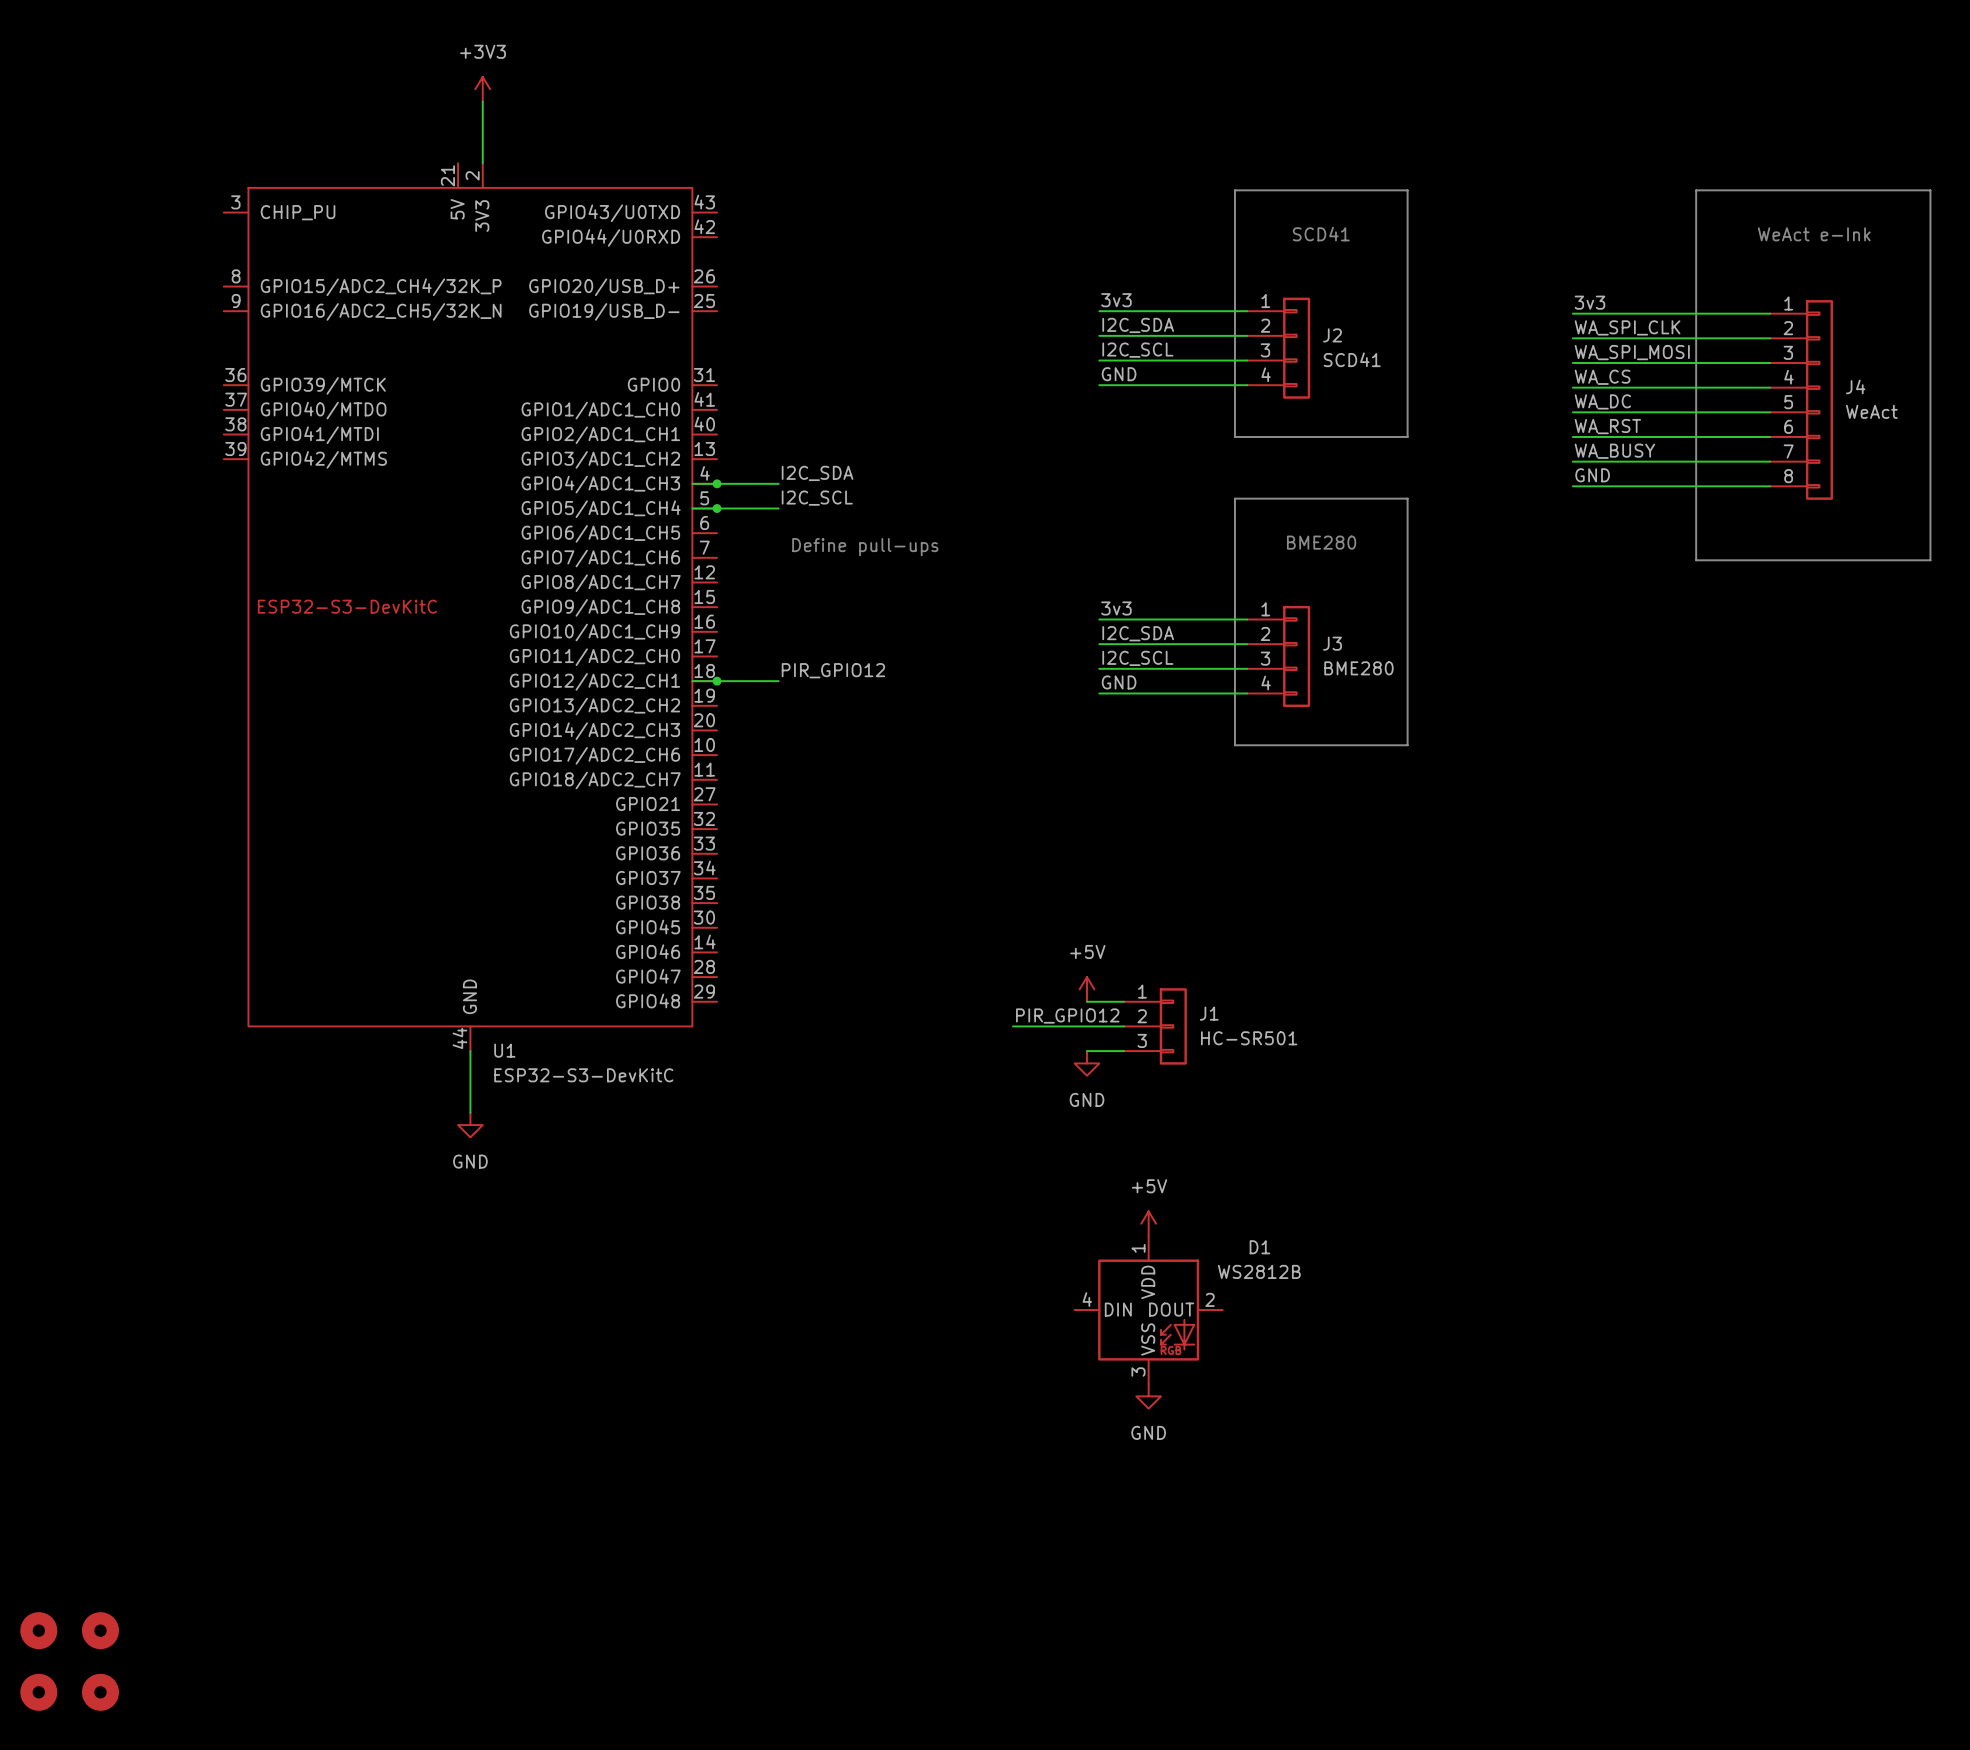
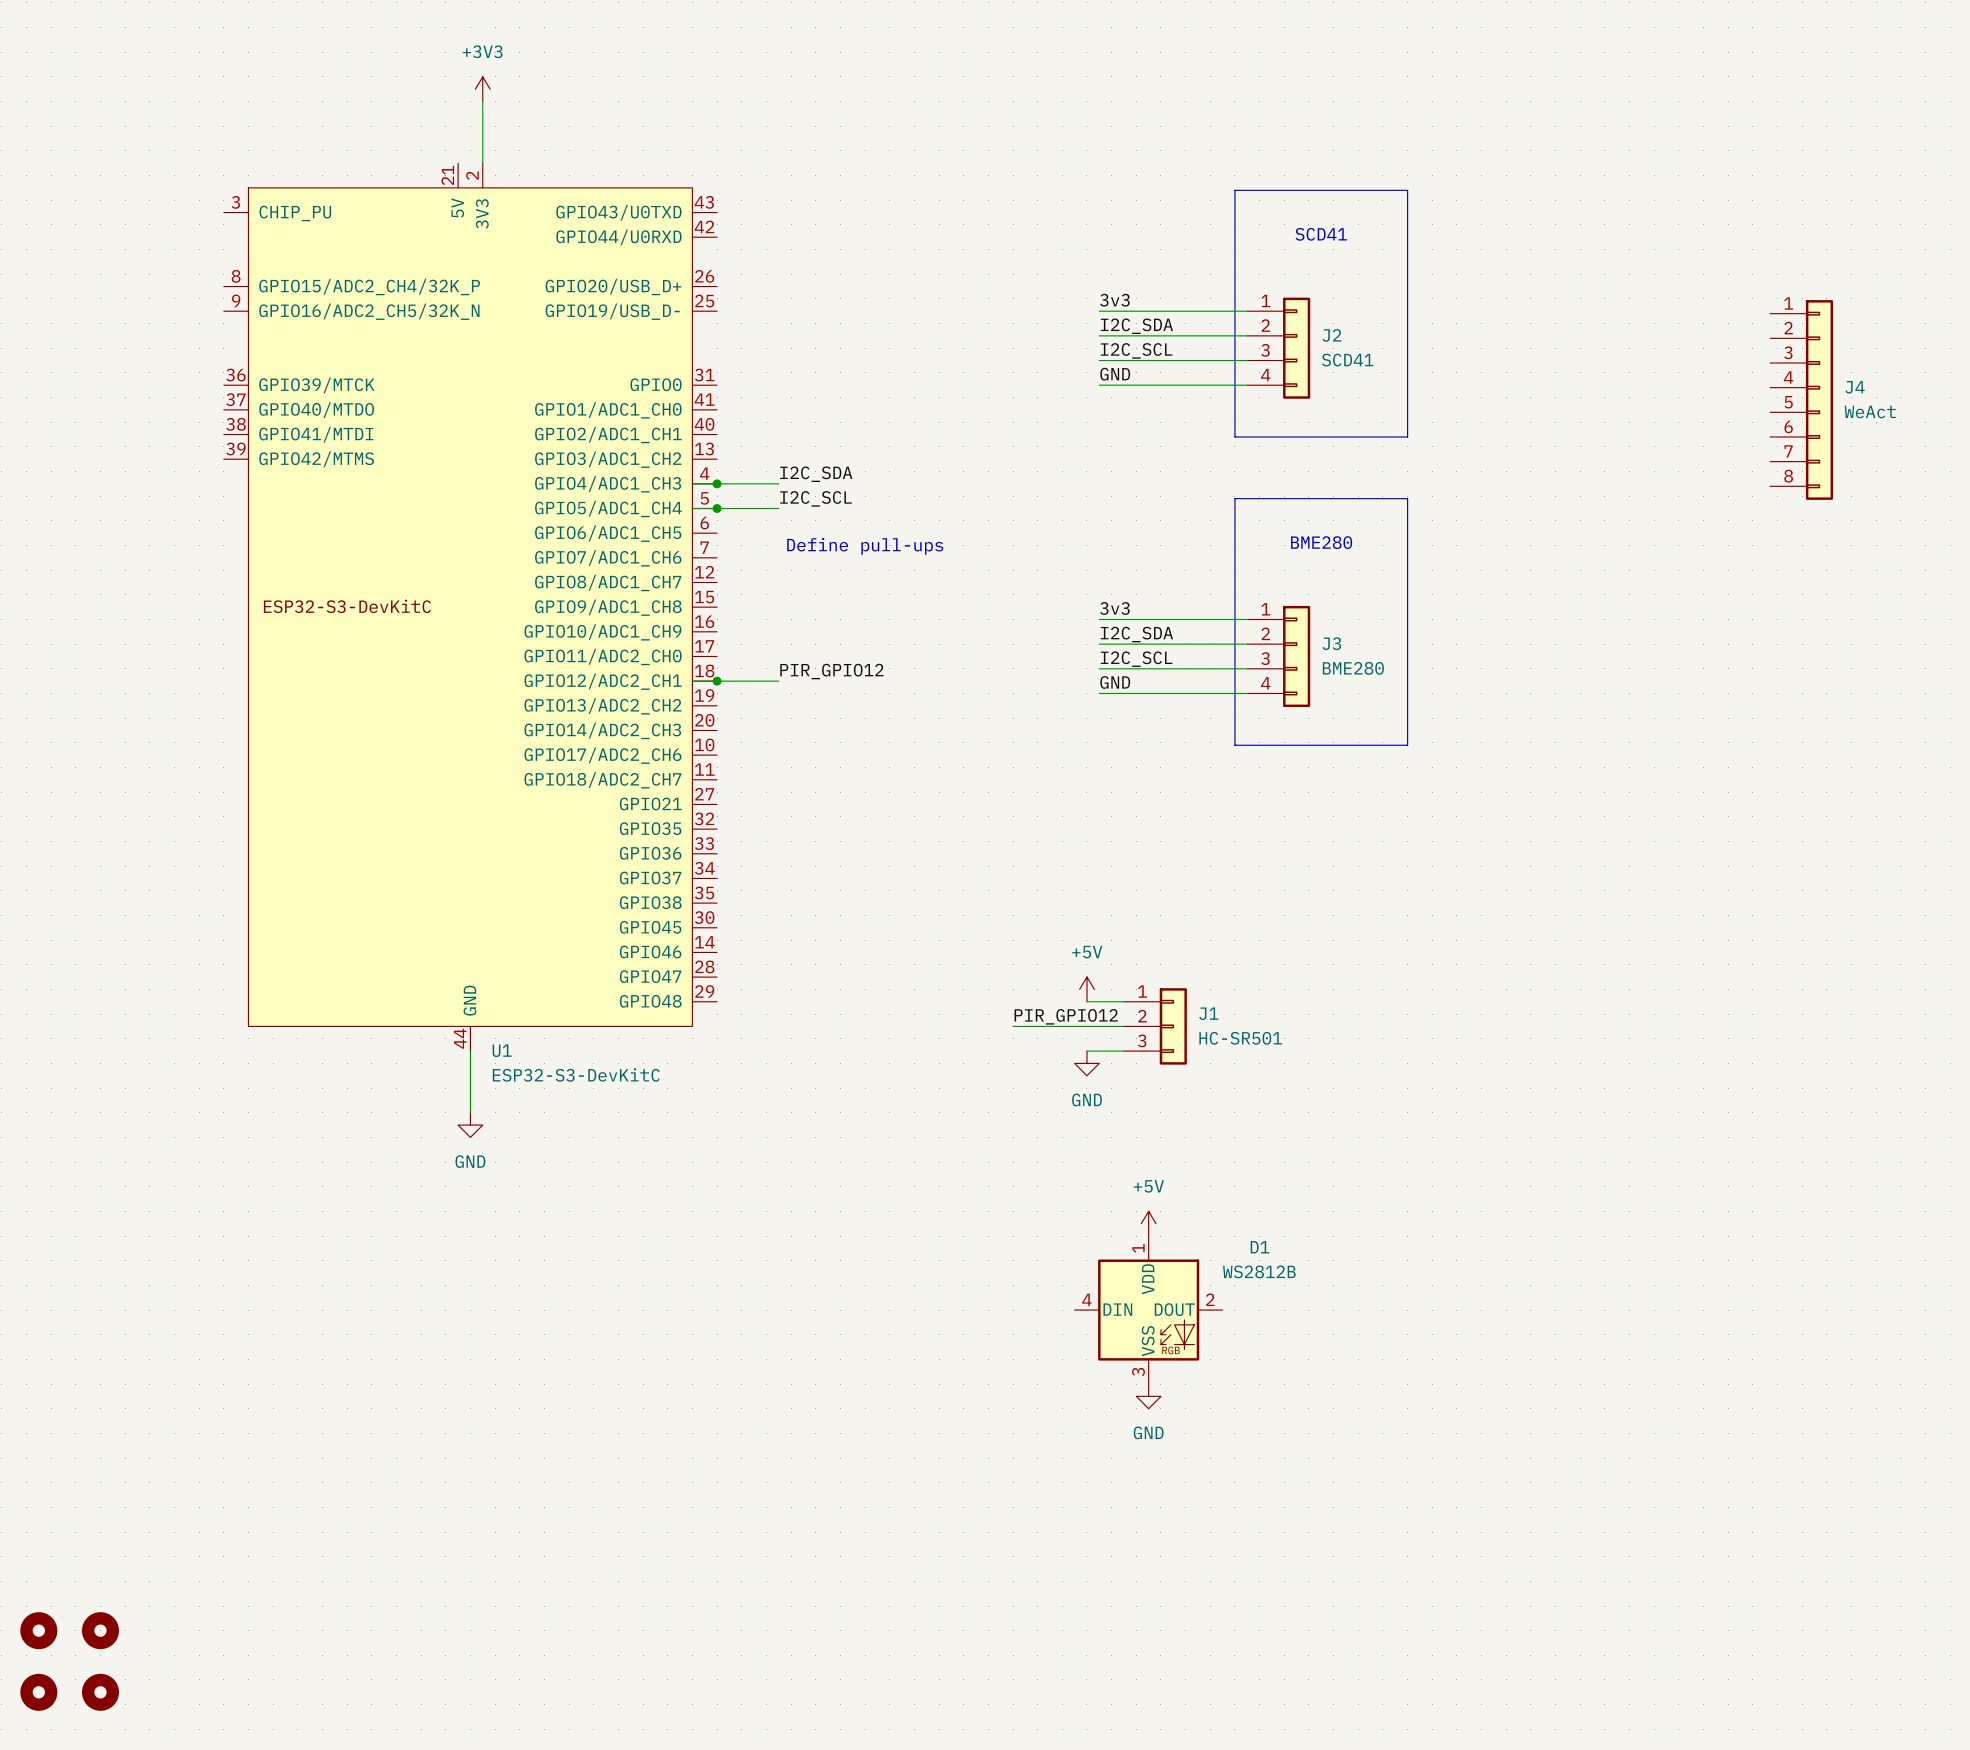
line: (1696, 190) (1930, 190) (1930, 560) (1696, 560) (1696, 190) -> none
text: WeAct e-Ink (1814, 234) -> none
label: 3v3 (1589, 302) -> none
wire: (1572, 313) (1770, 313) -> none
label: WA_SPI_CLK (1627, 327) -> none
wire: (1572, 338) (1770, 338) -> none
label: WA_SPI_MOSI (1632, 352) -> none
wire: (1572, 362) (1770, 362) -> none
label: WA_CS (1602, 377) -> none
wire: (1572, 387) (1770, 387) -> none
label: WA_DC (1602, 401) -> none
wire: (1572, 412) (1770, 412) -> none
label: WA_RST (1607, 426) -> none
wire: (1572, 436) (1770, 436) -> none
label: WA_BUSY (1614, 451) -> none
wire: (1572, 461) (1770, 461) -> none
label: GND (1592, 475) -> none
wire: (1572, 486) (1770, 486) -> none

